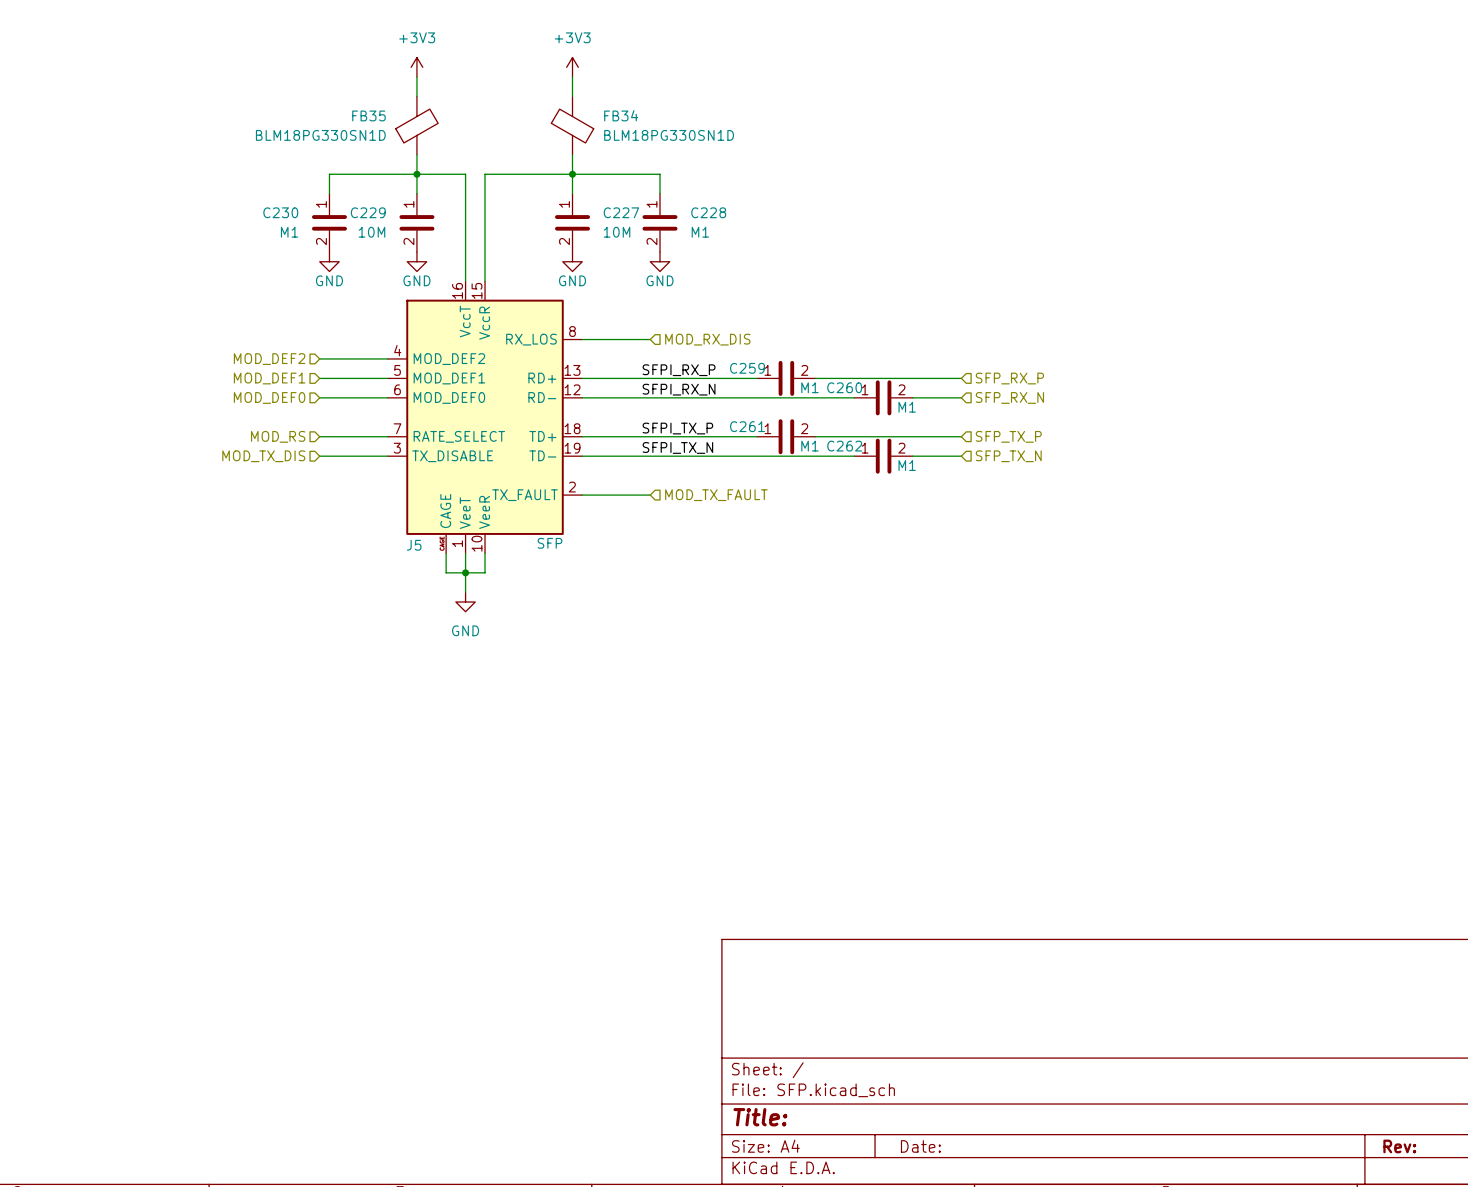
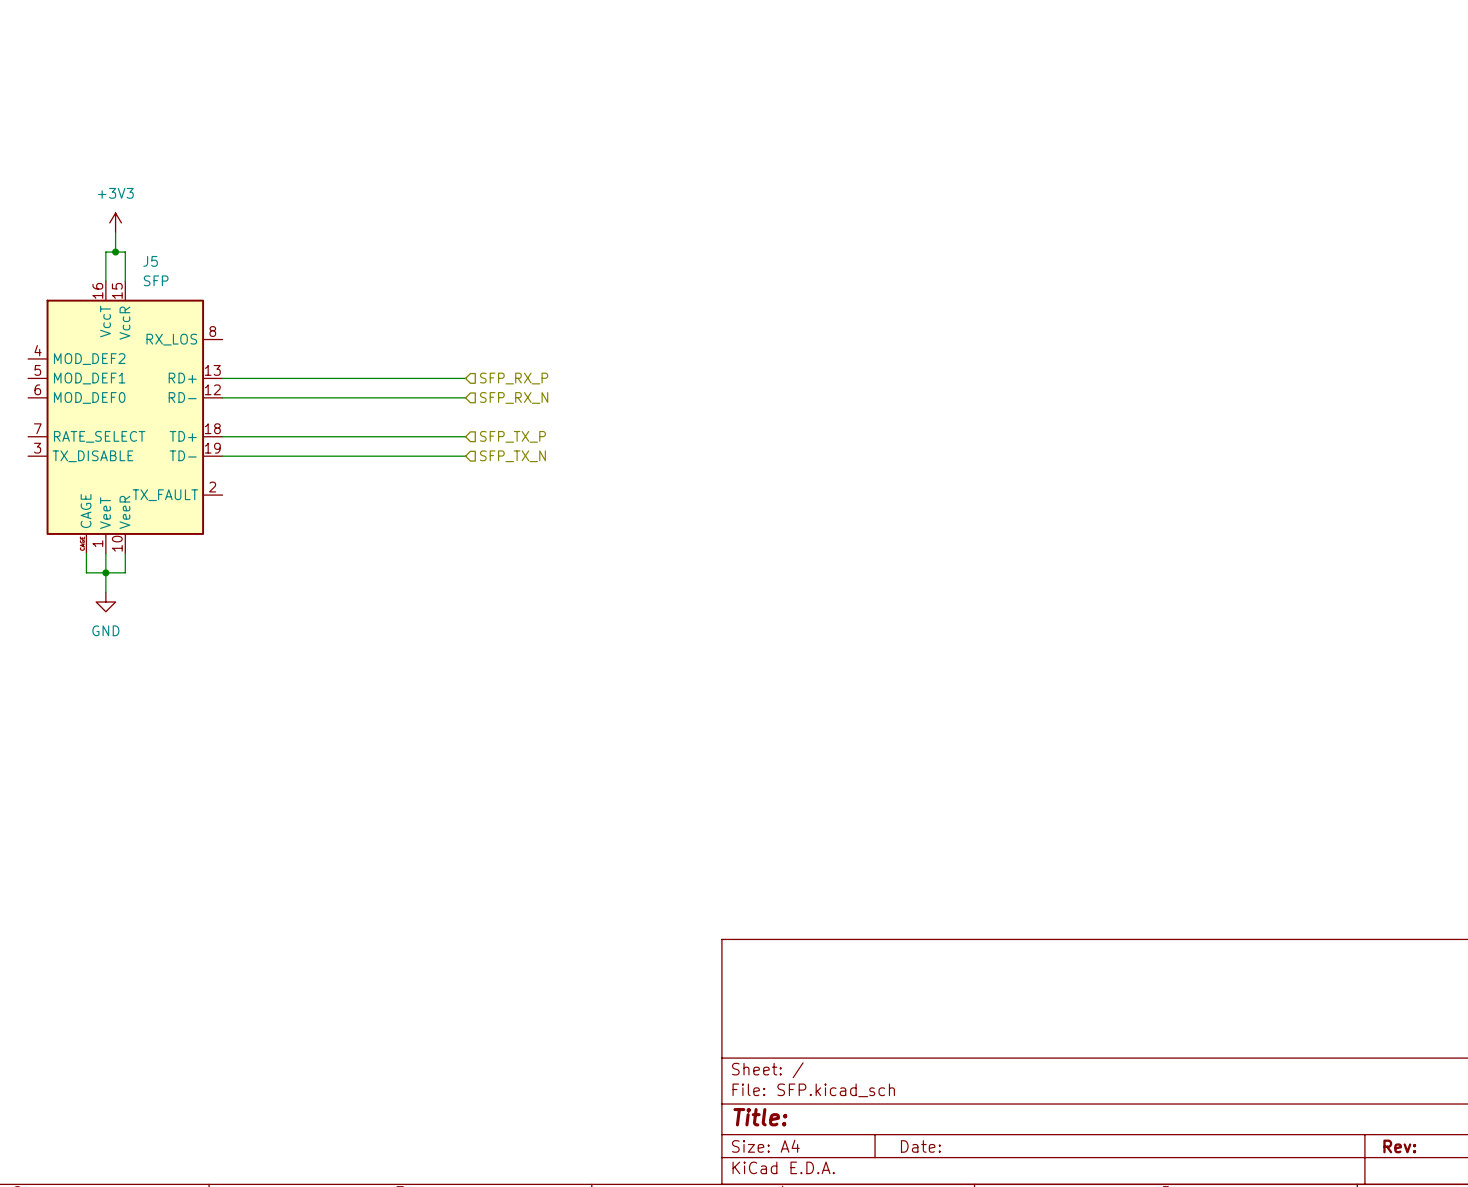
power symbol: +3V3 (416, 67) -> none
power symbol: +3V3 (572, 67) -> none
wire: (416, 77) (416, 96) -> none
wire: (572, 77) (572, 96) -> none
FB35: BLM18PG330SN1D (416, 125) -> none
FB34: BLM18PG330SN1D (572, 125) -> none
wire: (416, 154) (416, 193) -> none
wire: (572, 154) (572, 193) -> none
junction: (416, 174) -> none
junction: (572, 174) -> none
wire: (329, 193) (329, 174) (465, 174) (465, 281) -> none
wire: (660, 193) (660, 174) (485, 174) (485, 281) -> none
power symbol: none -> +3V3 (115, 222)
C230: M1 (329, 222) -> none
C229: 10M (416, 222) -> none
C227: 10M (572, 222) -> none
C228: M1 (660, 222) -> none
wire: none -> (115, 232) (115, 252)
junction: none -> (115, 252)
power symbol: GND (329, 261) -> none
power symbol: GND (416, 261) -> none
power symbol: GND (572, 261) -> none
power symbol: GND (660, 261) -> none
wire: none -> (105, 281) (105, 252) (125, 252) (125, 281)
wire: (582, 339) (650, 339) -> none
hierarchical label: MOD_RX_DIS (707, 339) -> none
wire: (319, 358) (387, 358) -> none
hierarchical label: MOD_DEF2 (269, 359) -> none
label: SFPI_RX_P (679, 370) -> none
wire: none -> (222, 378) (319, 378)
hierarchical label: MOD_DEF1 (269, 378) -> none
hierarchical label: none -> SFP_RX_P (514, 378)
wire: (582, 378) (757, 378) -> none
C259: M1 (786, 378) -> none
wire: (815, 378) (961, 378) -> none
hierarchical label: SFP_RX_P (1009, 378) -> none
label: SFPI_RX_N (679, 389) -> none
wire: none -> (222, 397) (319, 397)
hierarchical label: MOD_DEF0 (269, 397) -> none
hierarchical label: none -> SFP_RX_N (514, 397)
wire: (582, 397) (854, 397) -> none
C260: M1 (883, 397) -> none
wire: (912, 397) (961, 397) -> none
hierarchical label: SFP_RX_N (1009, 397) -> none
J5 position: (485, 417) -> (125, 417)
label: SFPI_TX_P (677, 428) -> none
wire: none -> (222, 436) (319, 436)
hierarchical label: MOD_RS (278, 436) -> none
hierarchical label: none -> SFP_TX_P (512, 436)
wire: (582, 436) (757, 436) -> none
C261: M1 (786, 436) -> none
wire: (815, 436) (961, 436) -> none
hierarchical label: SFP_TX_P (1008, 436) -> none
label: SFPI_TX_N (677, 447) -> none
wire: none -> (222, 456) (319, 456)
hierarchical label: MOD_TX_DIS (263, 456) -> none
hierarchical label: none -> SFP_TX_N (512, 456)
wire: (582, 456) (854, 456) -> none
C262: M1 (883, 456) -> none
wire: (912, 456) (961, 456) -> none
hierarchical label: SFP_TX_N (1008, 456) -> none
wire: (582, 495) (650, 495) -> none
hierarchical label: MOD_TX_FAULT (716, 495) -> none
J5 value position: SFP (549, 543) -> SFP (156, 280)
J5 name position: J5 (414, 545) -> J5 (150, 261)
wire: none -> (86, 553) (86, 572) (125, 572) (125, 553)
wire: none -> (105, 553) (105, 592)
wire: (446, 553) (446, 572) (485, 572) (485, 553) -> none
wire: (465, 553) (465, 592) -> none
junction: none -> (105, 572)
junction: (465, 572) -> none
power symbol: none -> GND (105, 602)
power symbol: GND (465, 602) -> none

